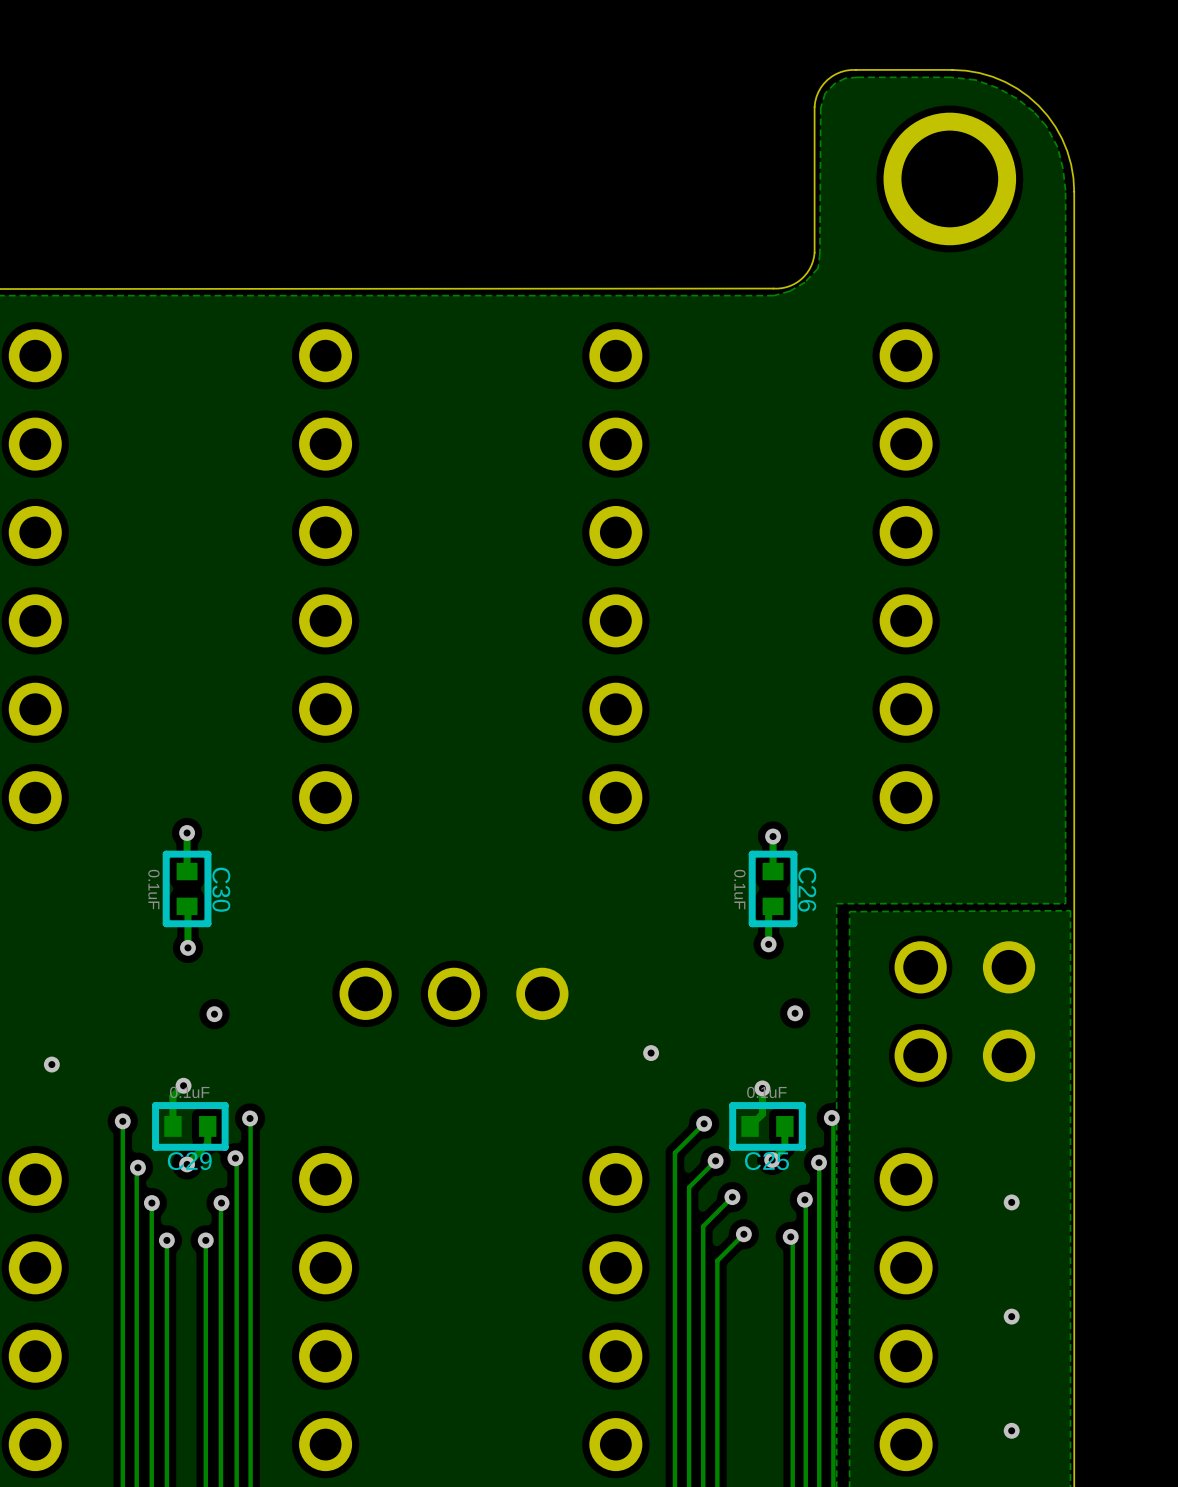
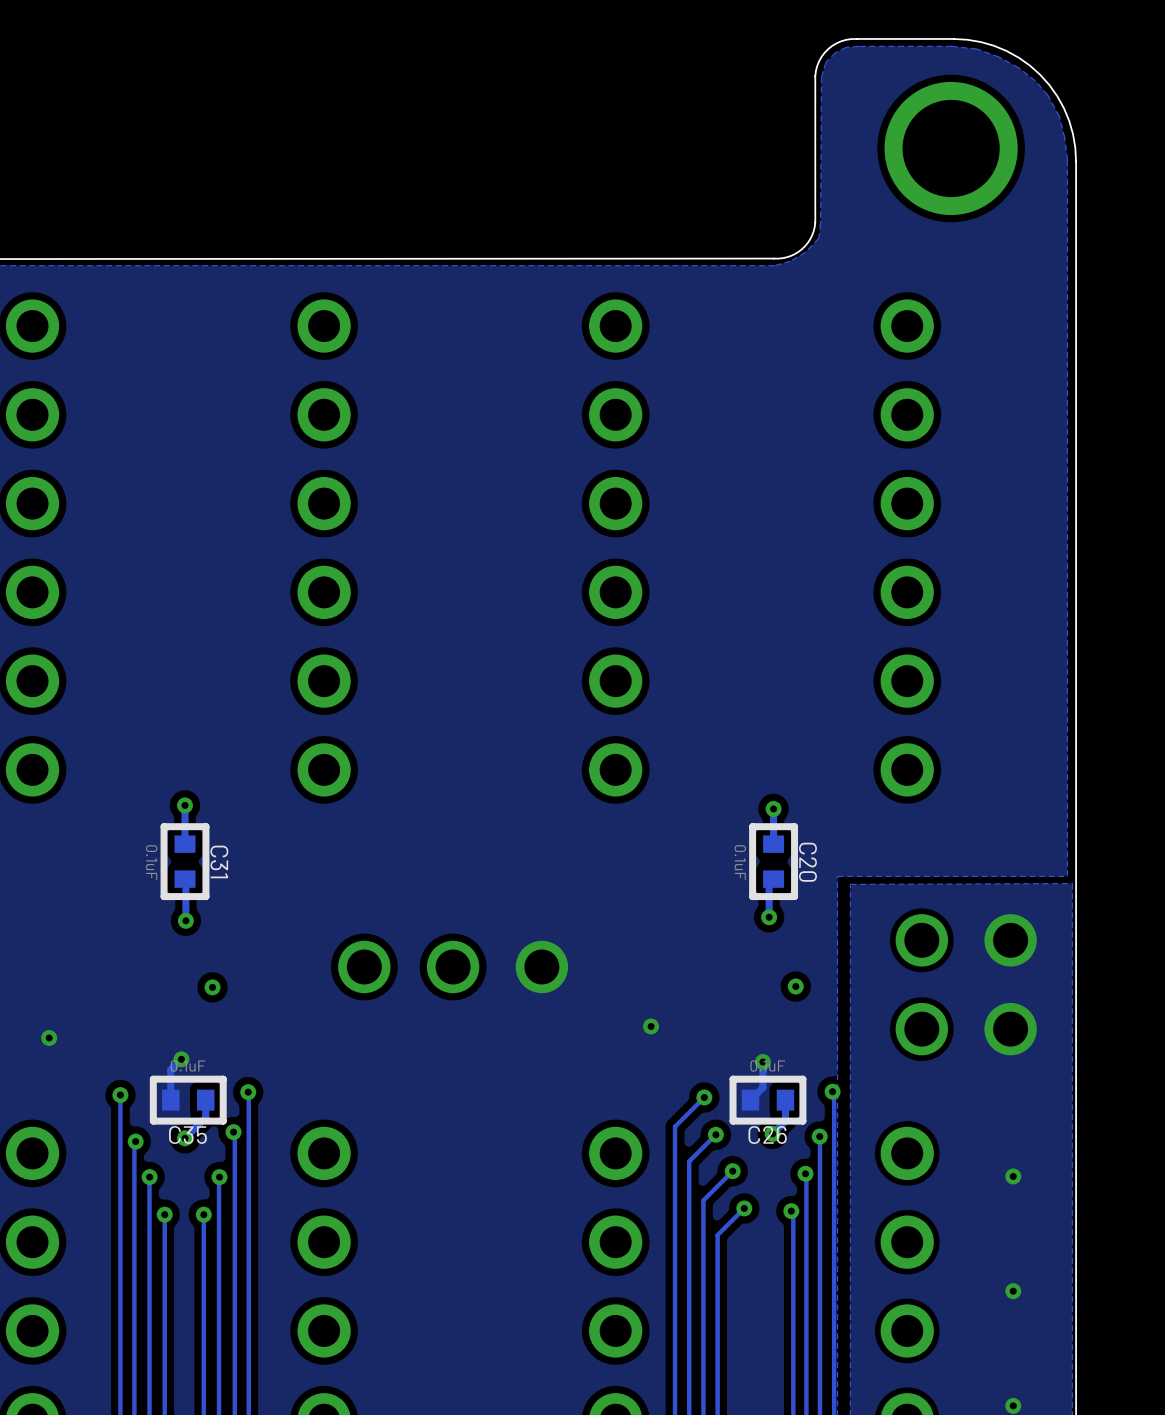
C30 name: C30 (221, 889) -> C31 (219, 861)
C26 name: C26 (807, 889) -> C20 (807, 862)
C29 name: C29 (189, 1161) -> C35 (187, 1135)
C25 name: C25 (766, 1161) -> C26 (767, 1135)

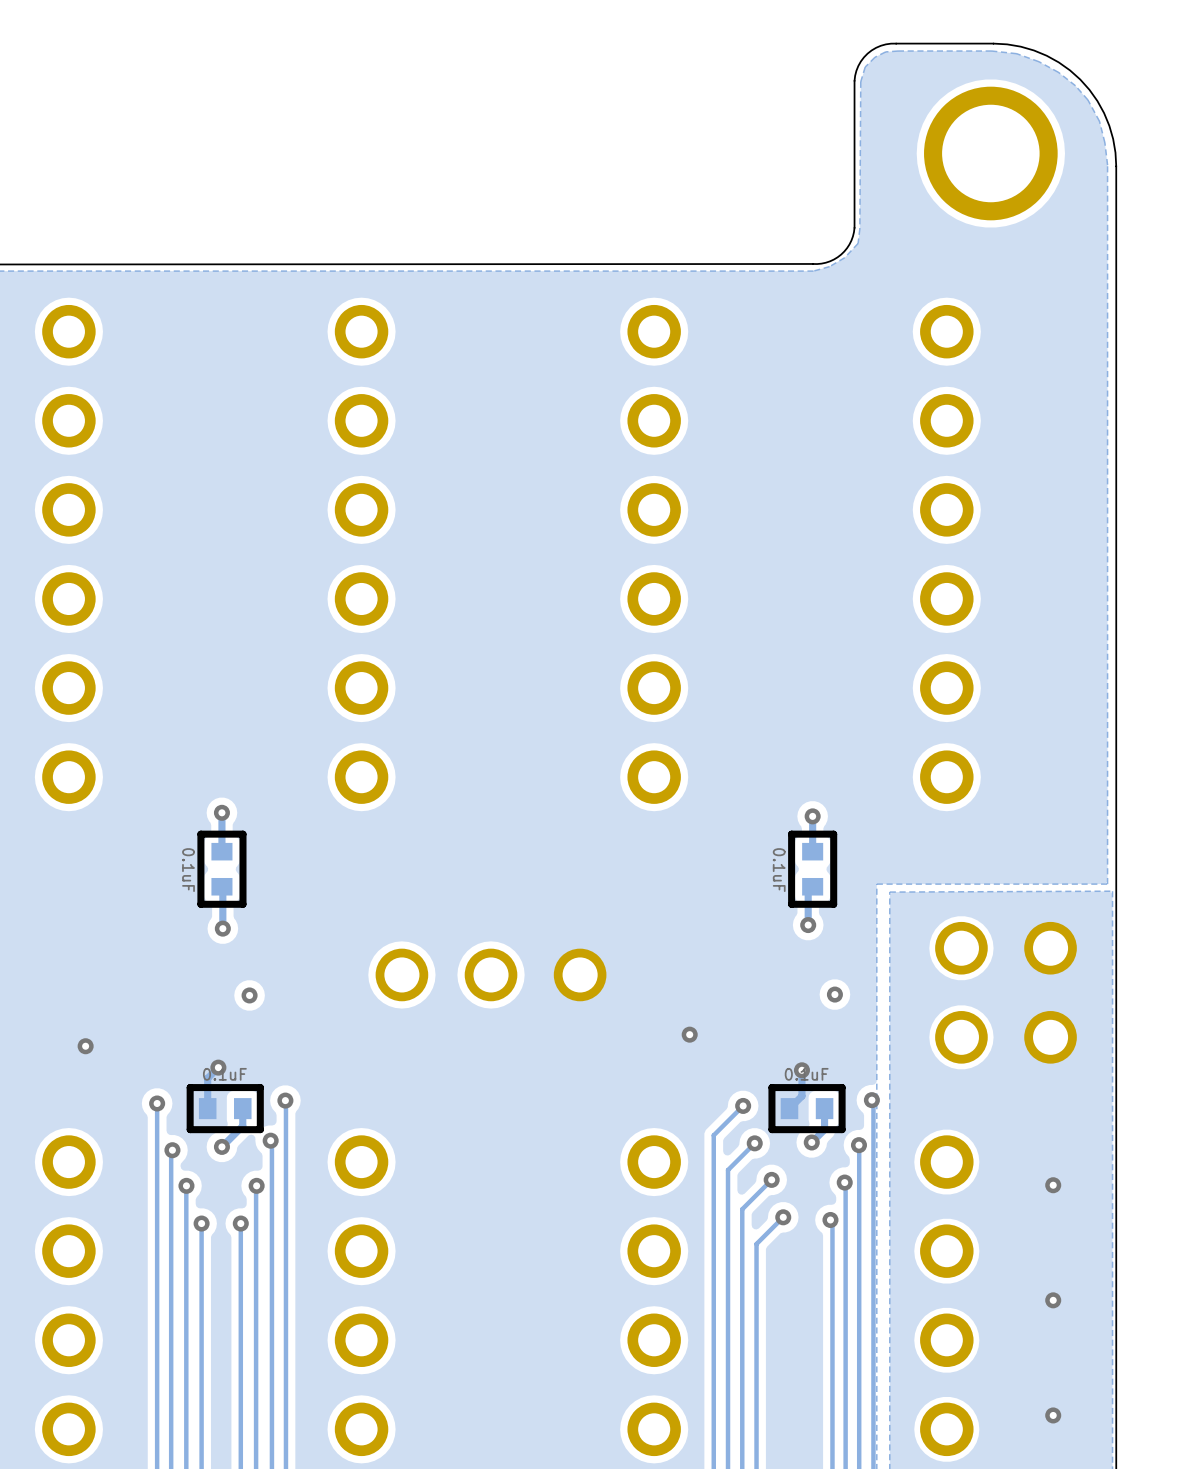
C31 name: C31 (219, 861) -> none
C20 name: C20 (807, 862) -> none
C35 name: C35 (187, 1135) -> none
C26 name: C26 (767, 1135) -> none

